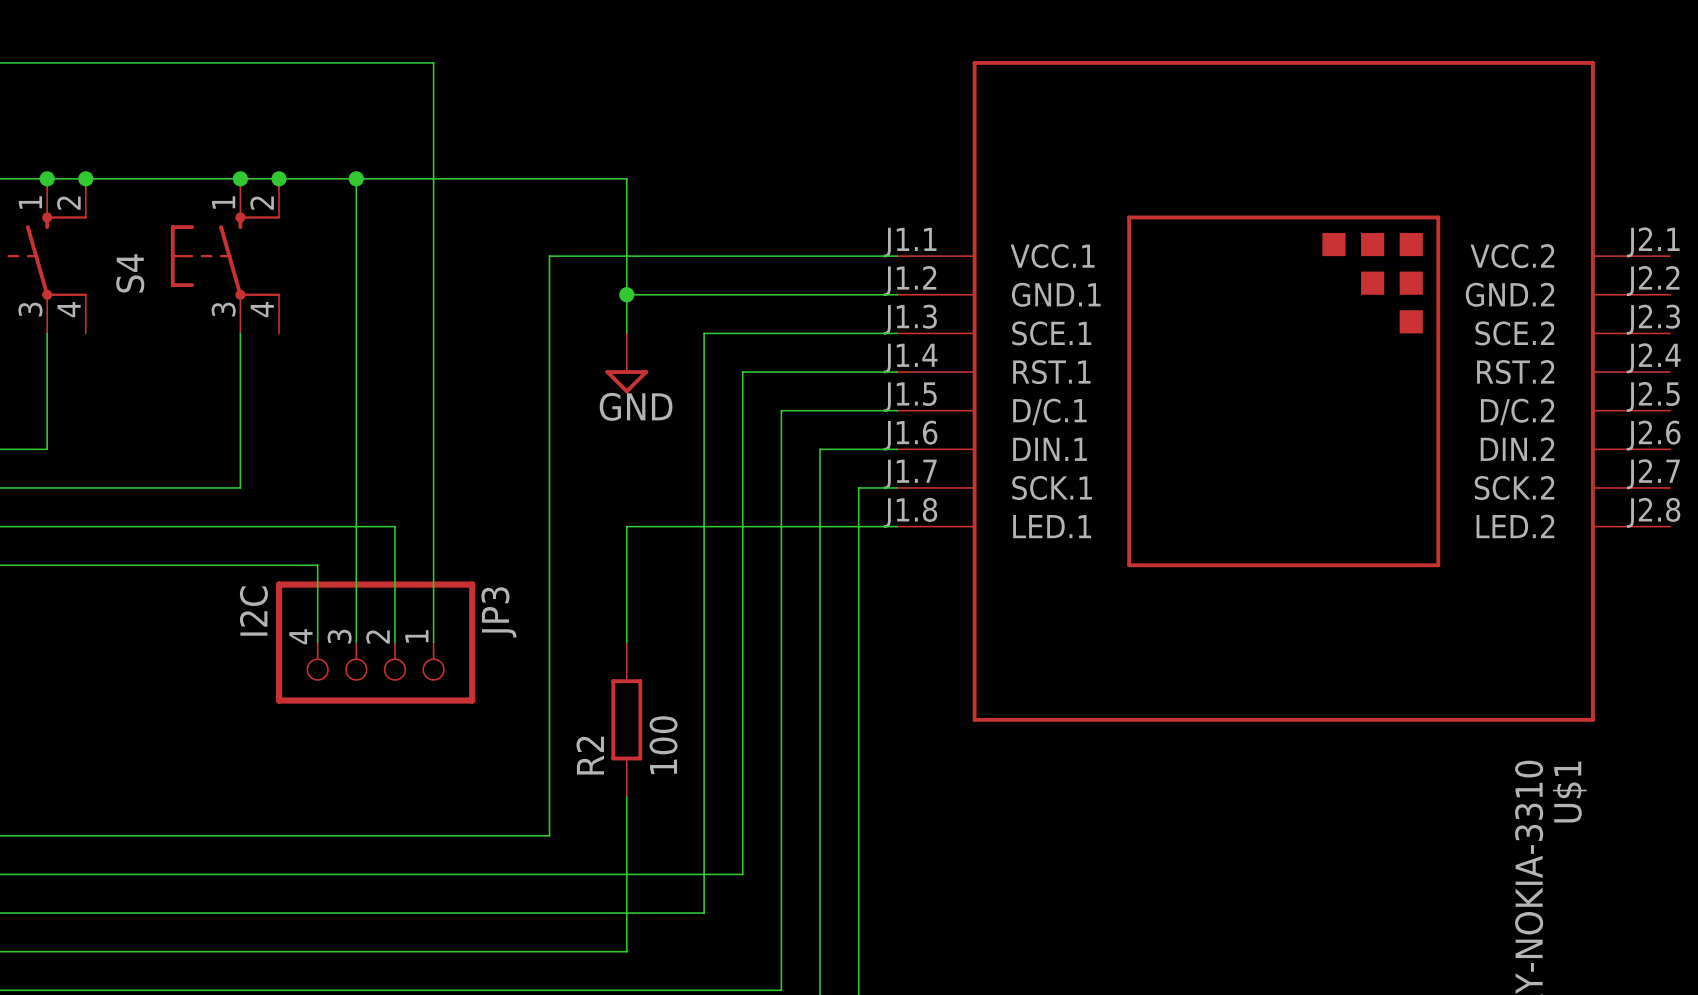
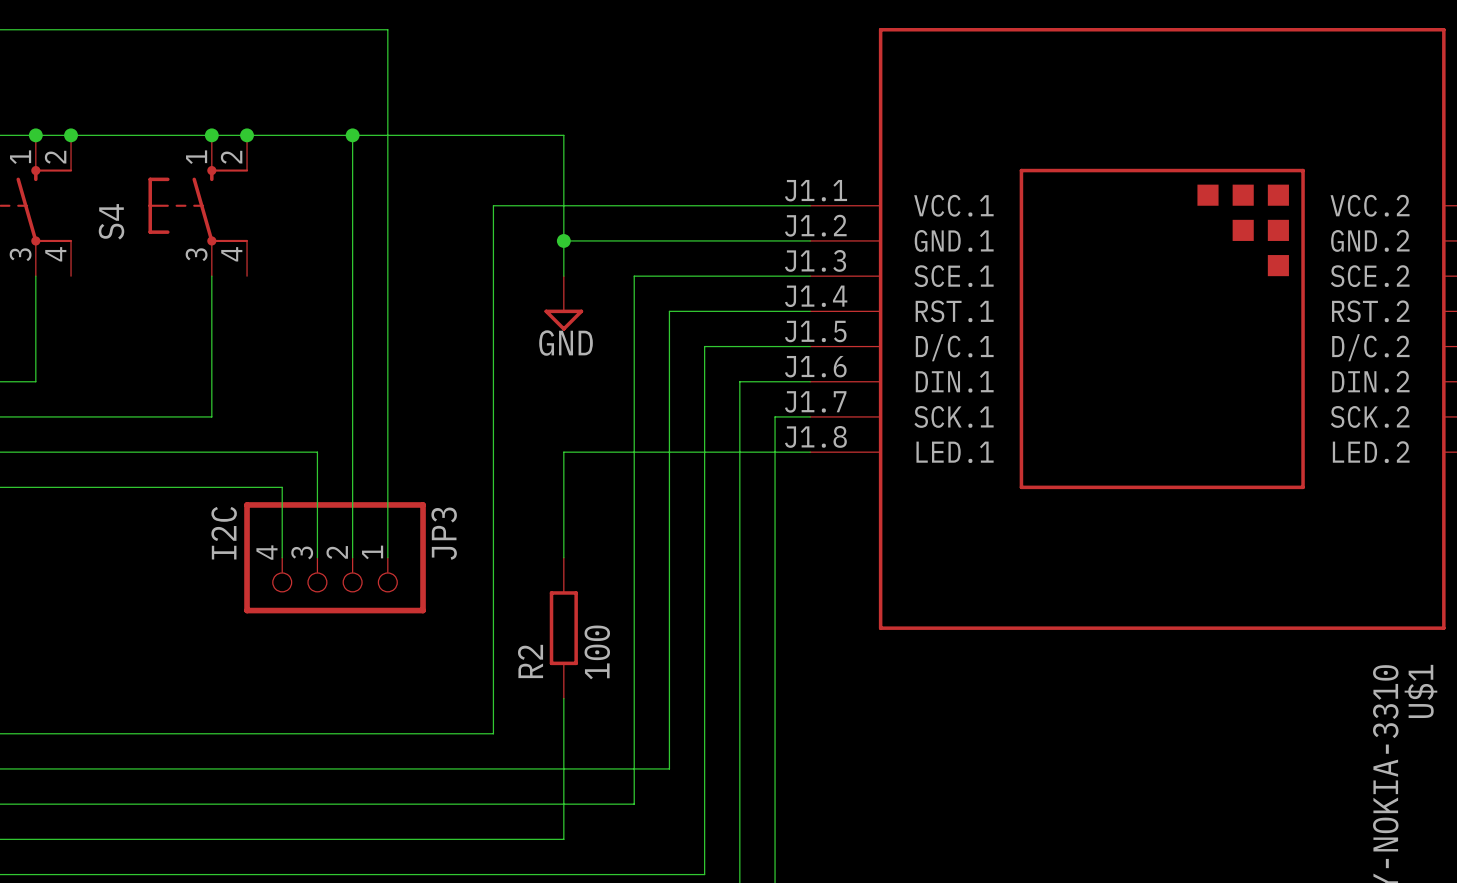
wire: (356, 178) (356, 526) (394, 526) -> (352, 135) (352, 452)
junction position: (356, 178) -> (352, 135)

